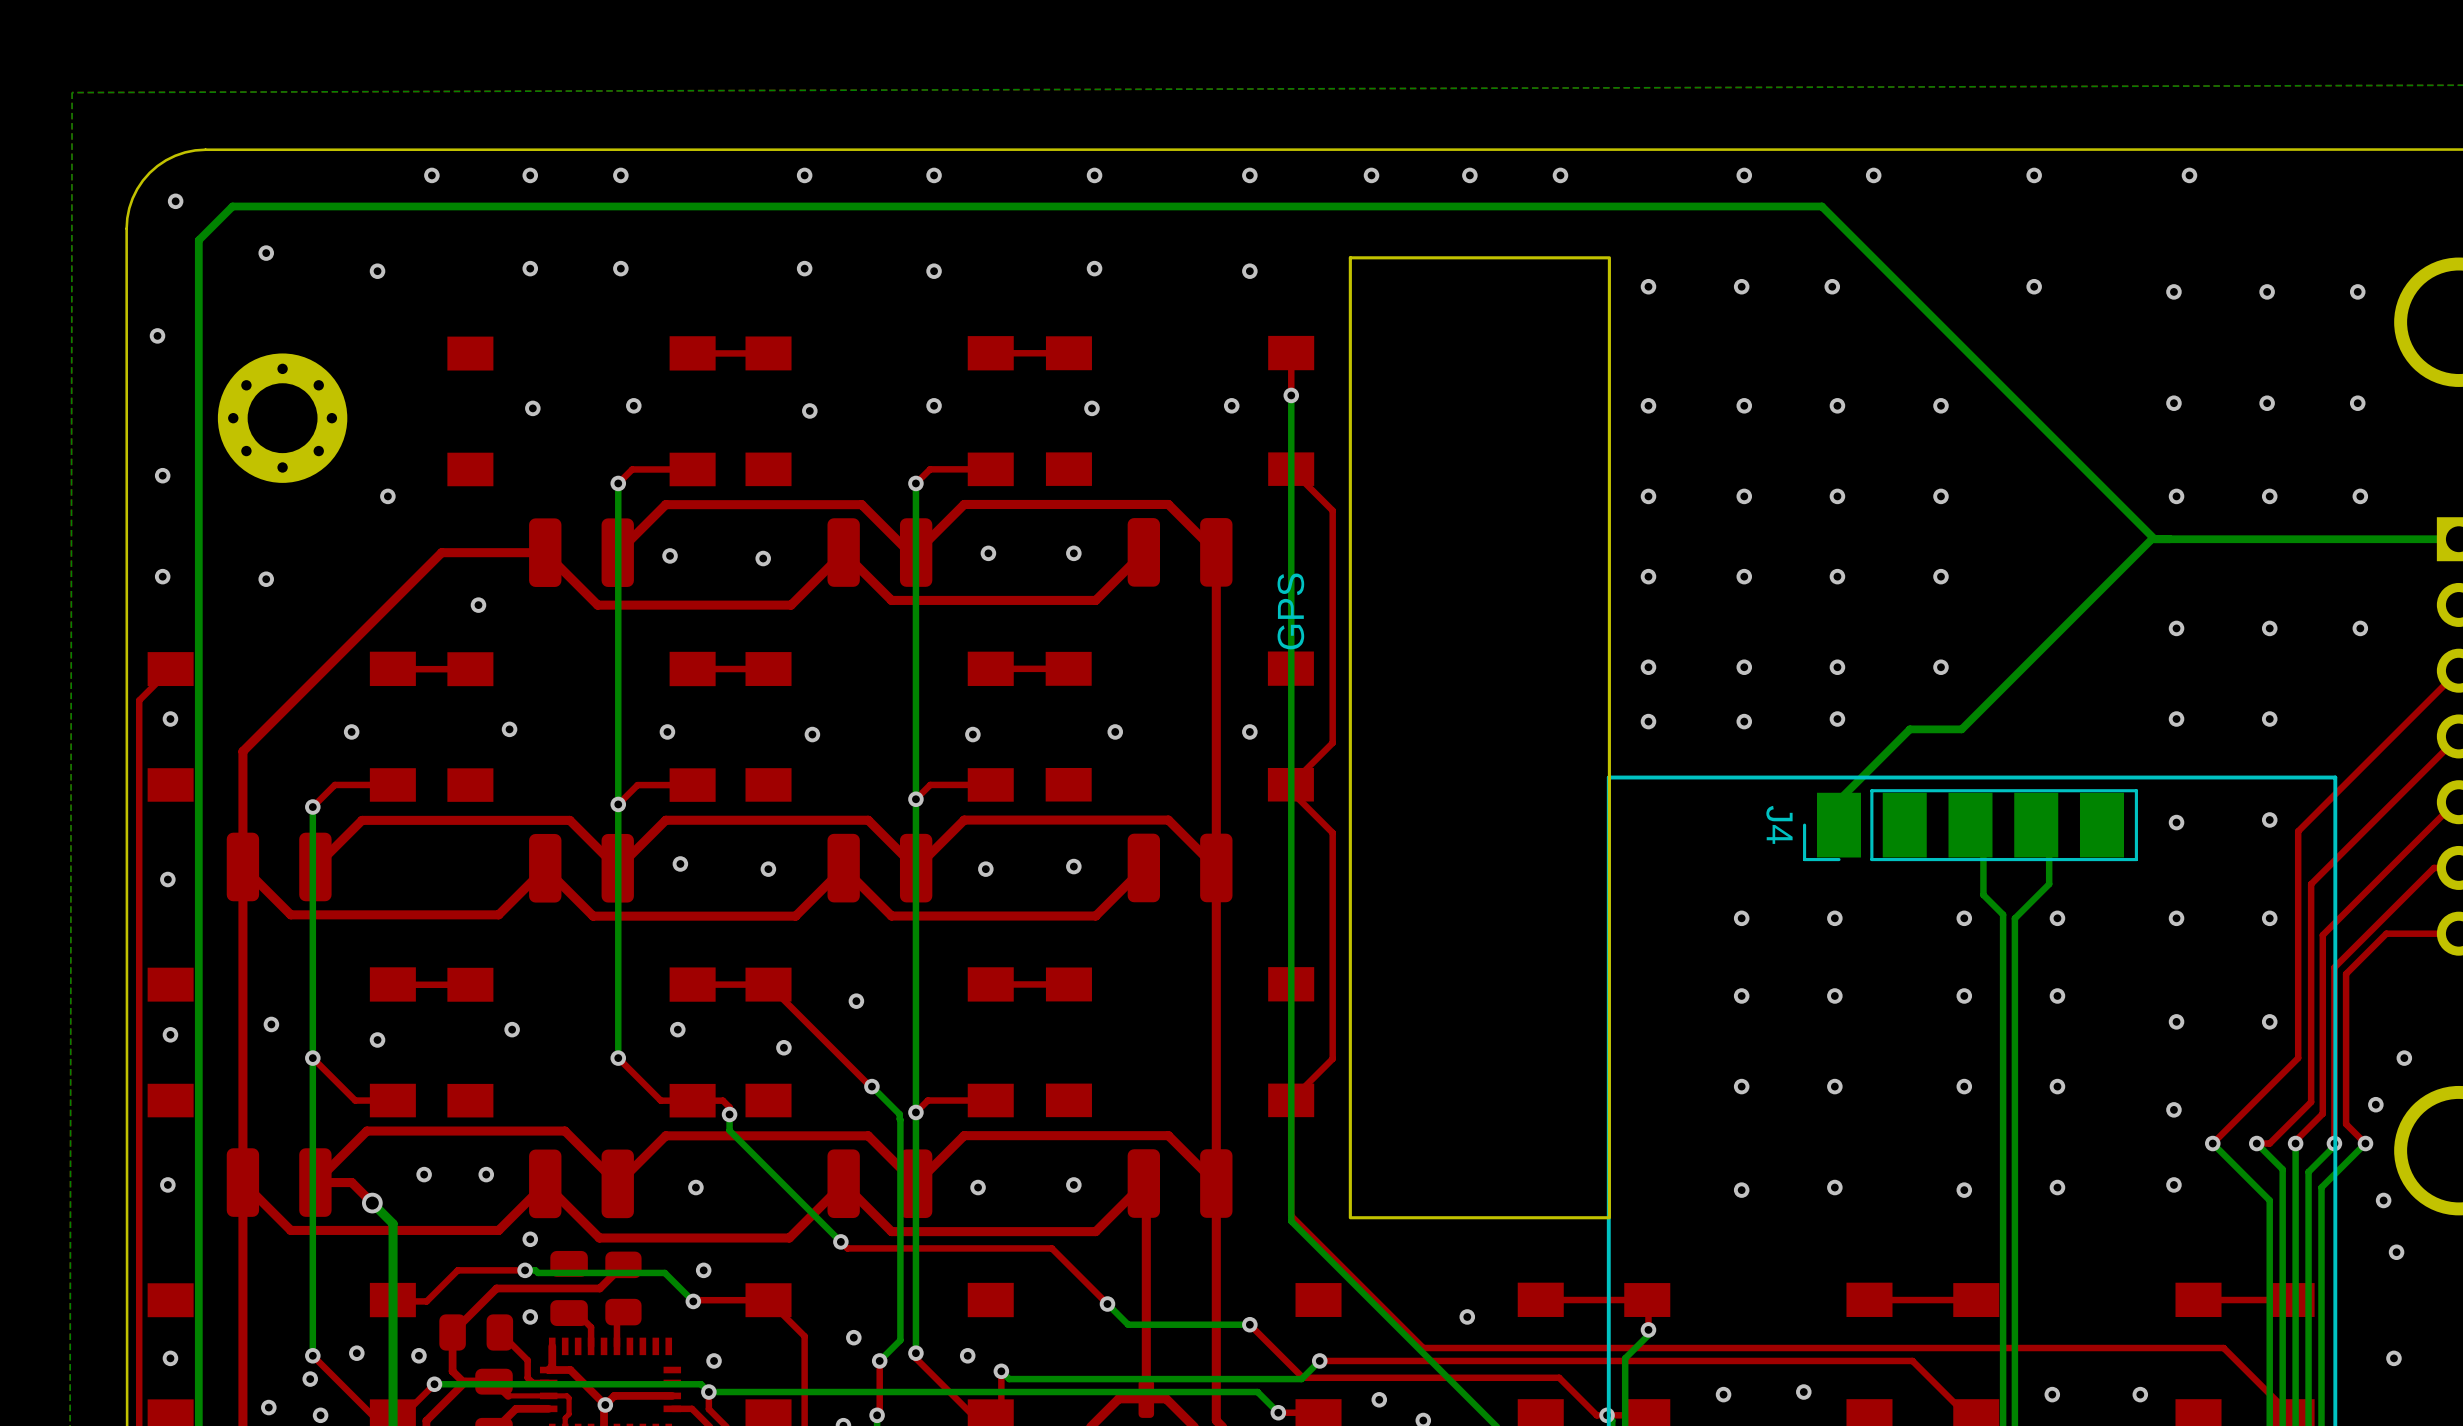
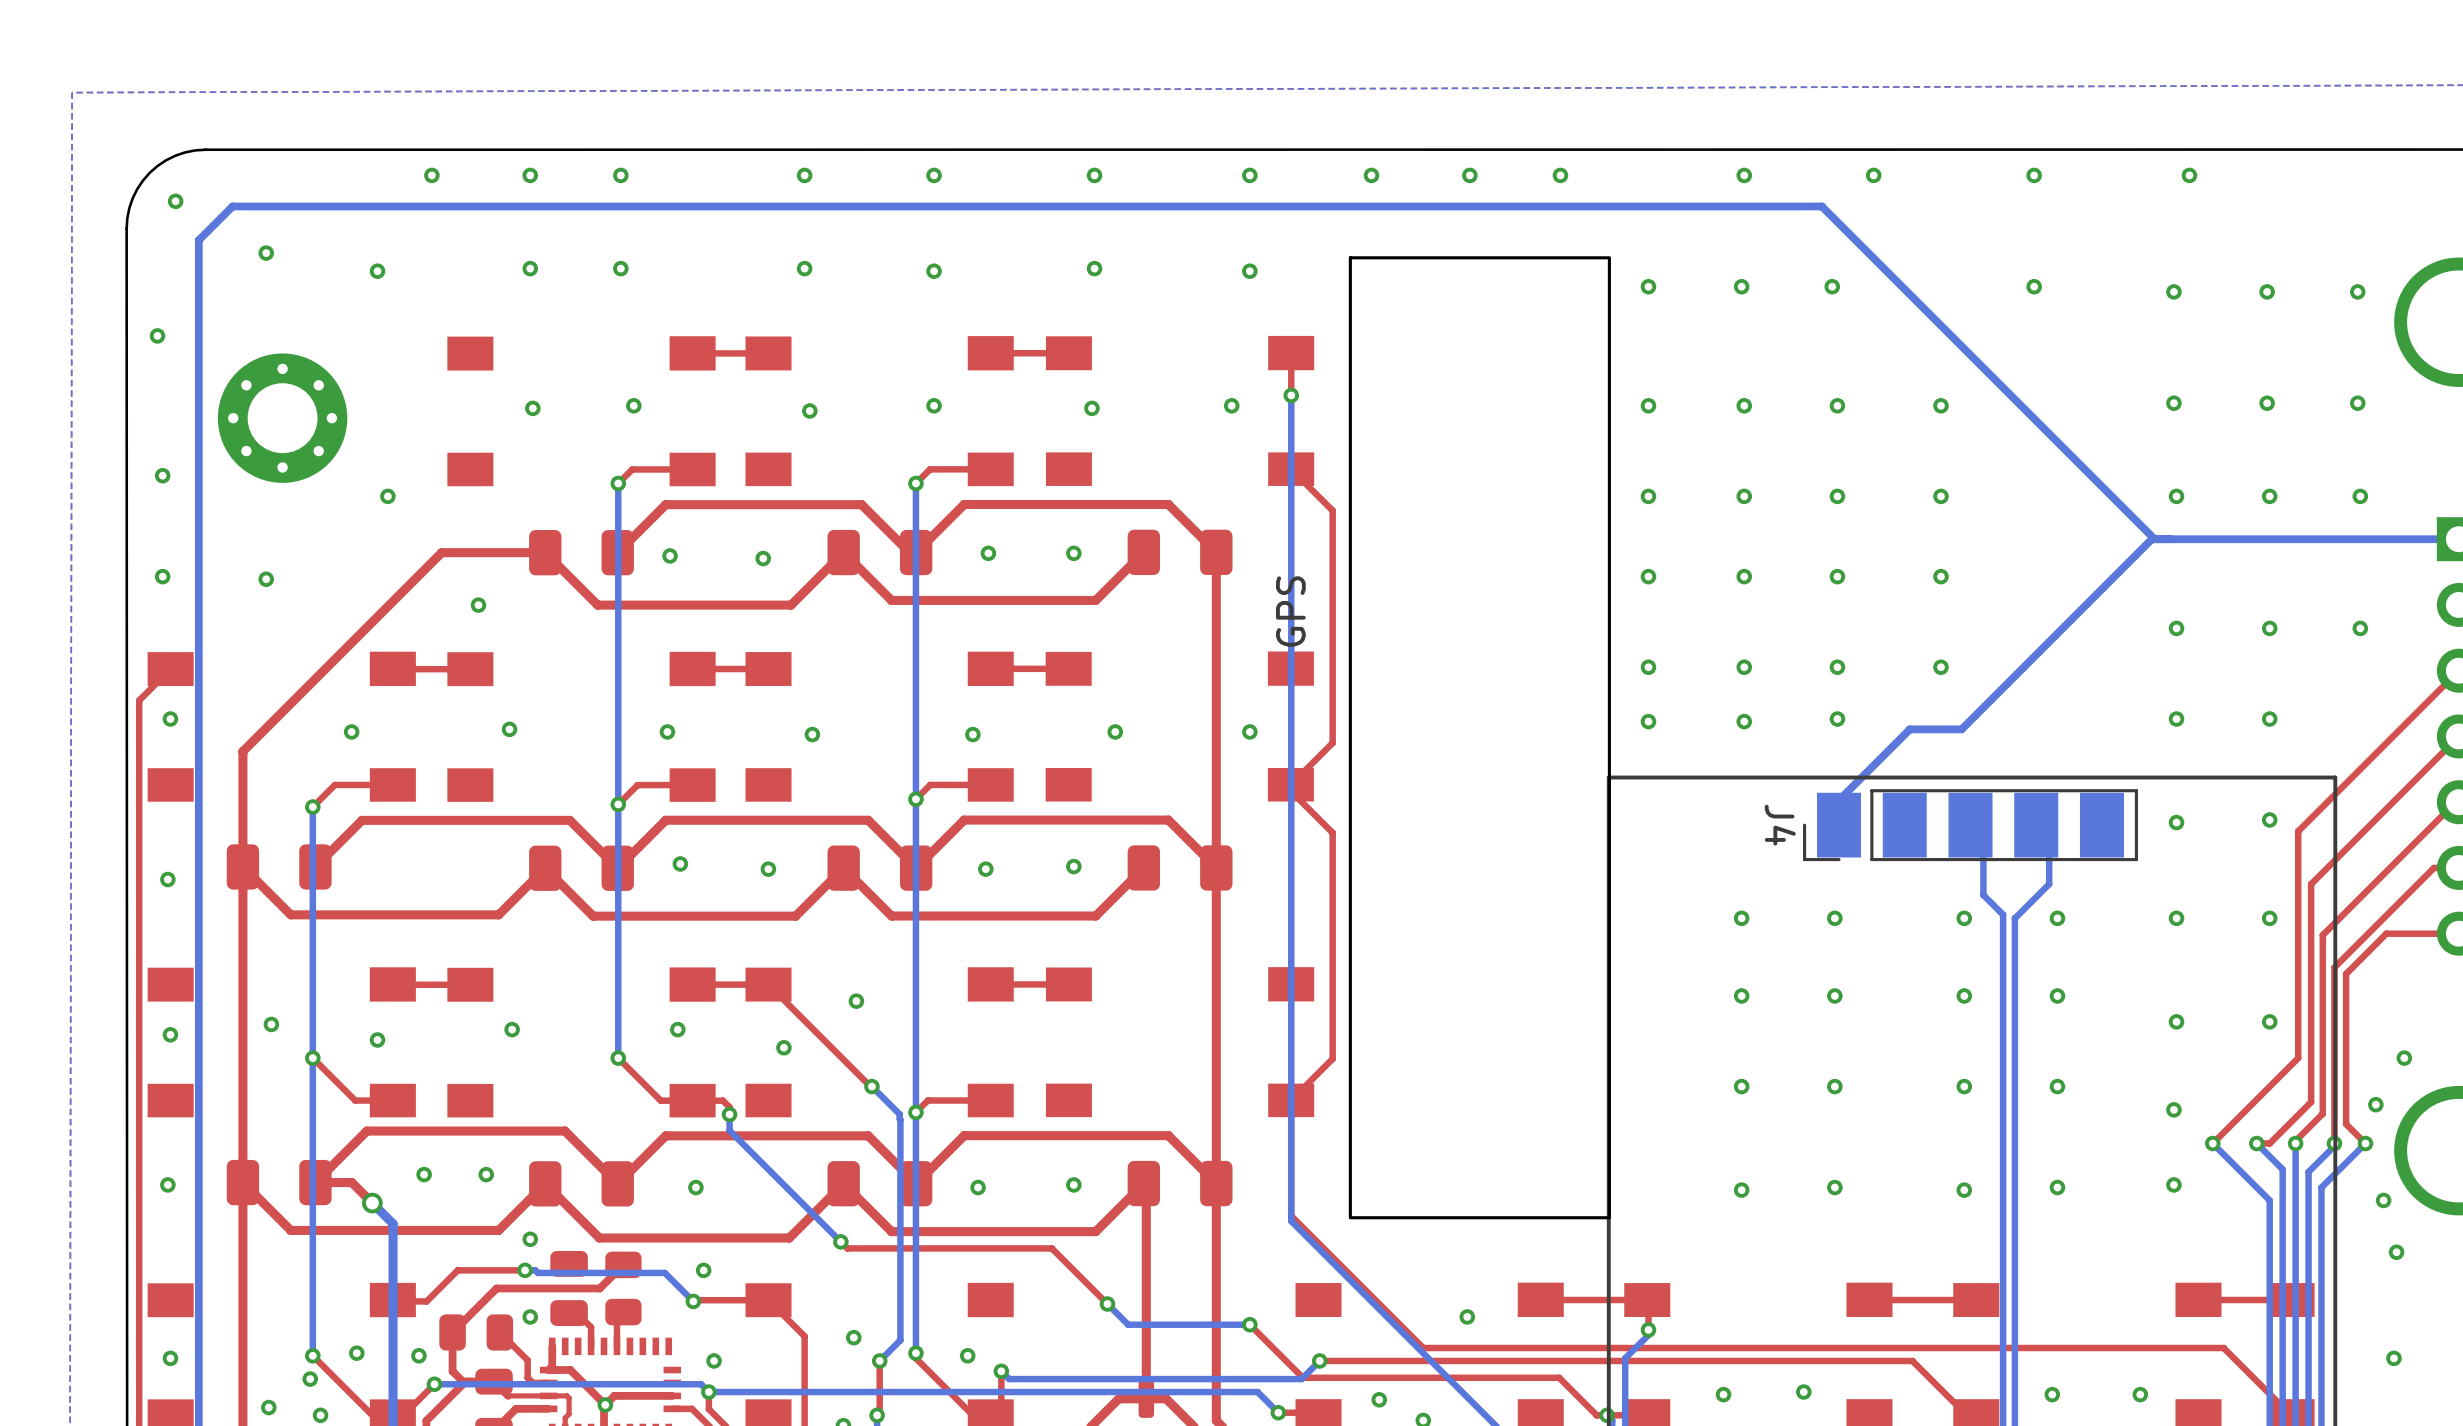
part footprint: [529, 518, 634, 587] -> [529, 530, 634, 576]
part footprint: [827, 518, 933, 587] -> [827, 529, 933, 576]
part footprint: [1127, 518, 1233, 587] -> [1127, 529, 1233, 576]
part footprint: [226, 832, 332, 902] -> [226, 844, 332, 890]
part footprint: [529, 833, 634, 903] -> [529, 845, 634, 891]
part footprint: [827, 833, 933, 903] -> [827, 845, 933, 891]
part footprint: [1127, 833, 1233, 903] -> [1127, 845, 1233, 891]
part footprint: [226, 1148, 332, 1217] -> [226, 1159, 332, 1206]
part footprint: [529, 1149, 634, 1219] -> [529, 1161, 634, 1207]
part footprint: [827, 1149, 933, 1219] -> [827, 1161, 933, 1207]
part footprint: [1127, 1149, 1233, 1218] -> [1127, 1160, 1233, 1207]

